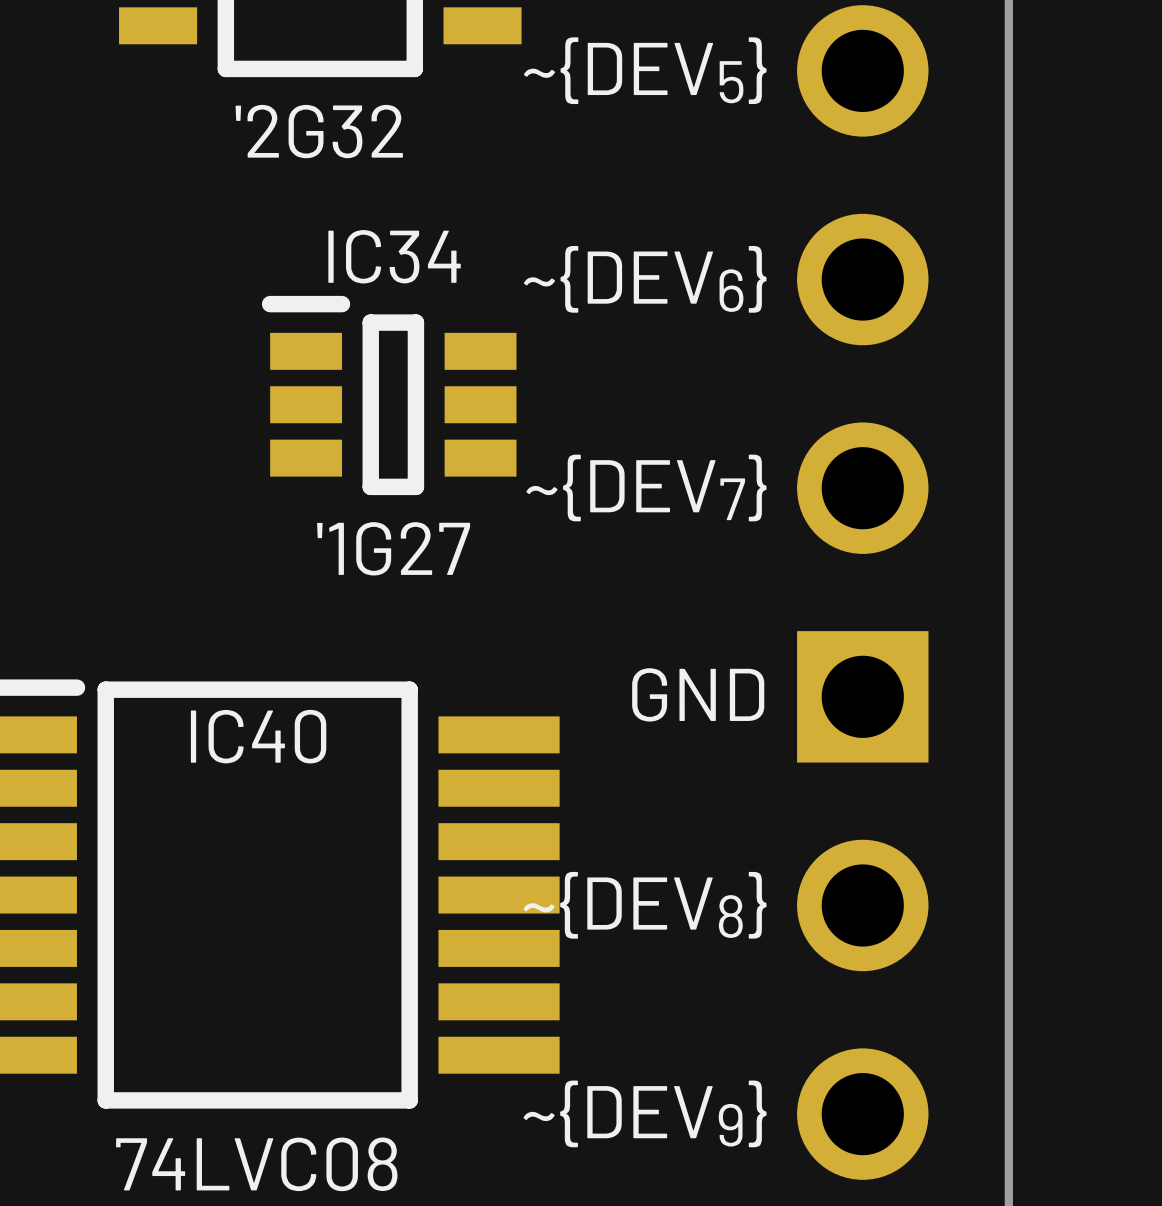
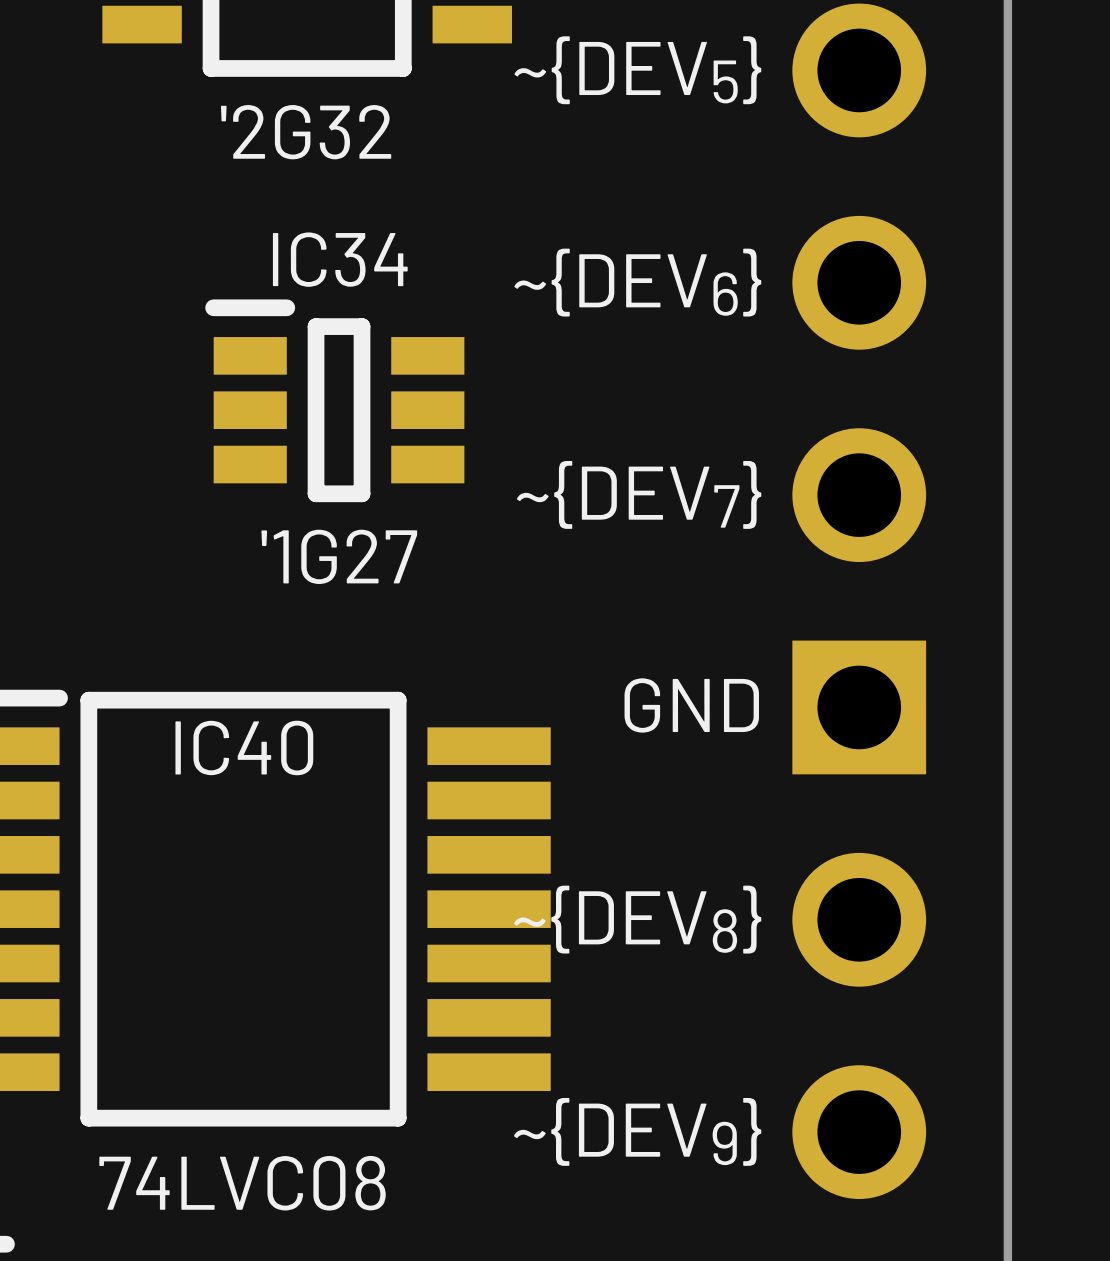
IC34 position: (389, 395) -> (334, 400)

